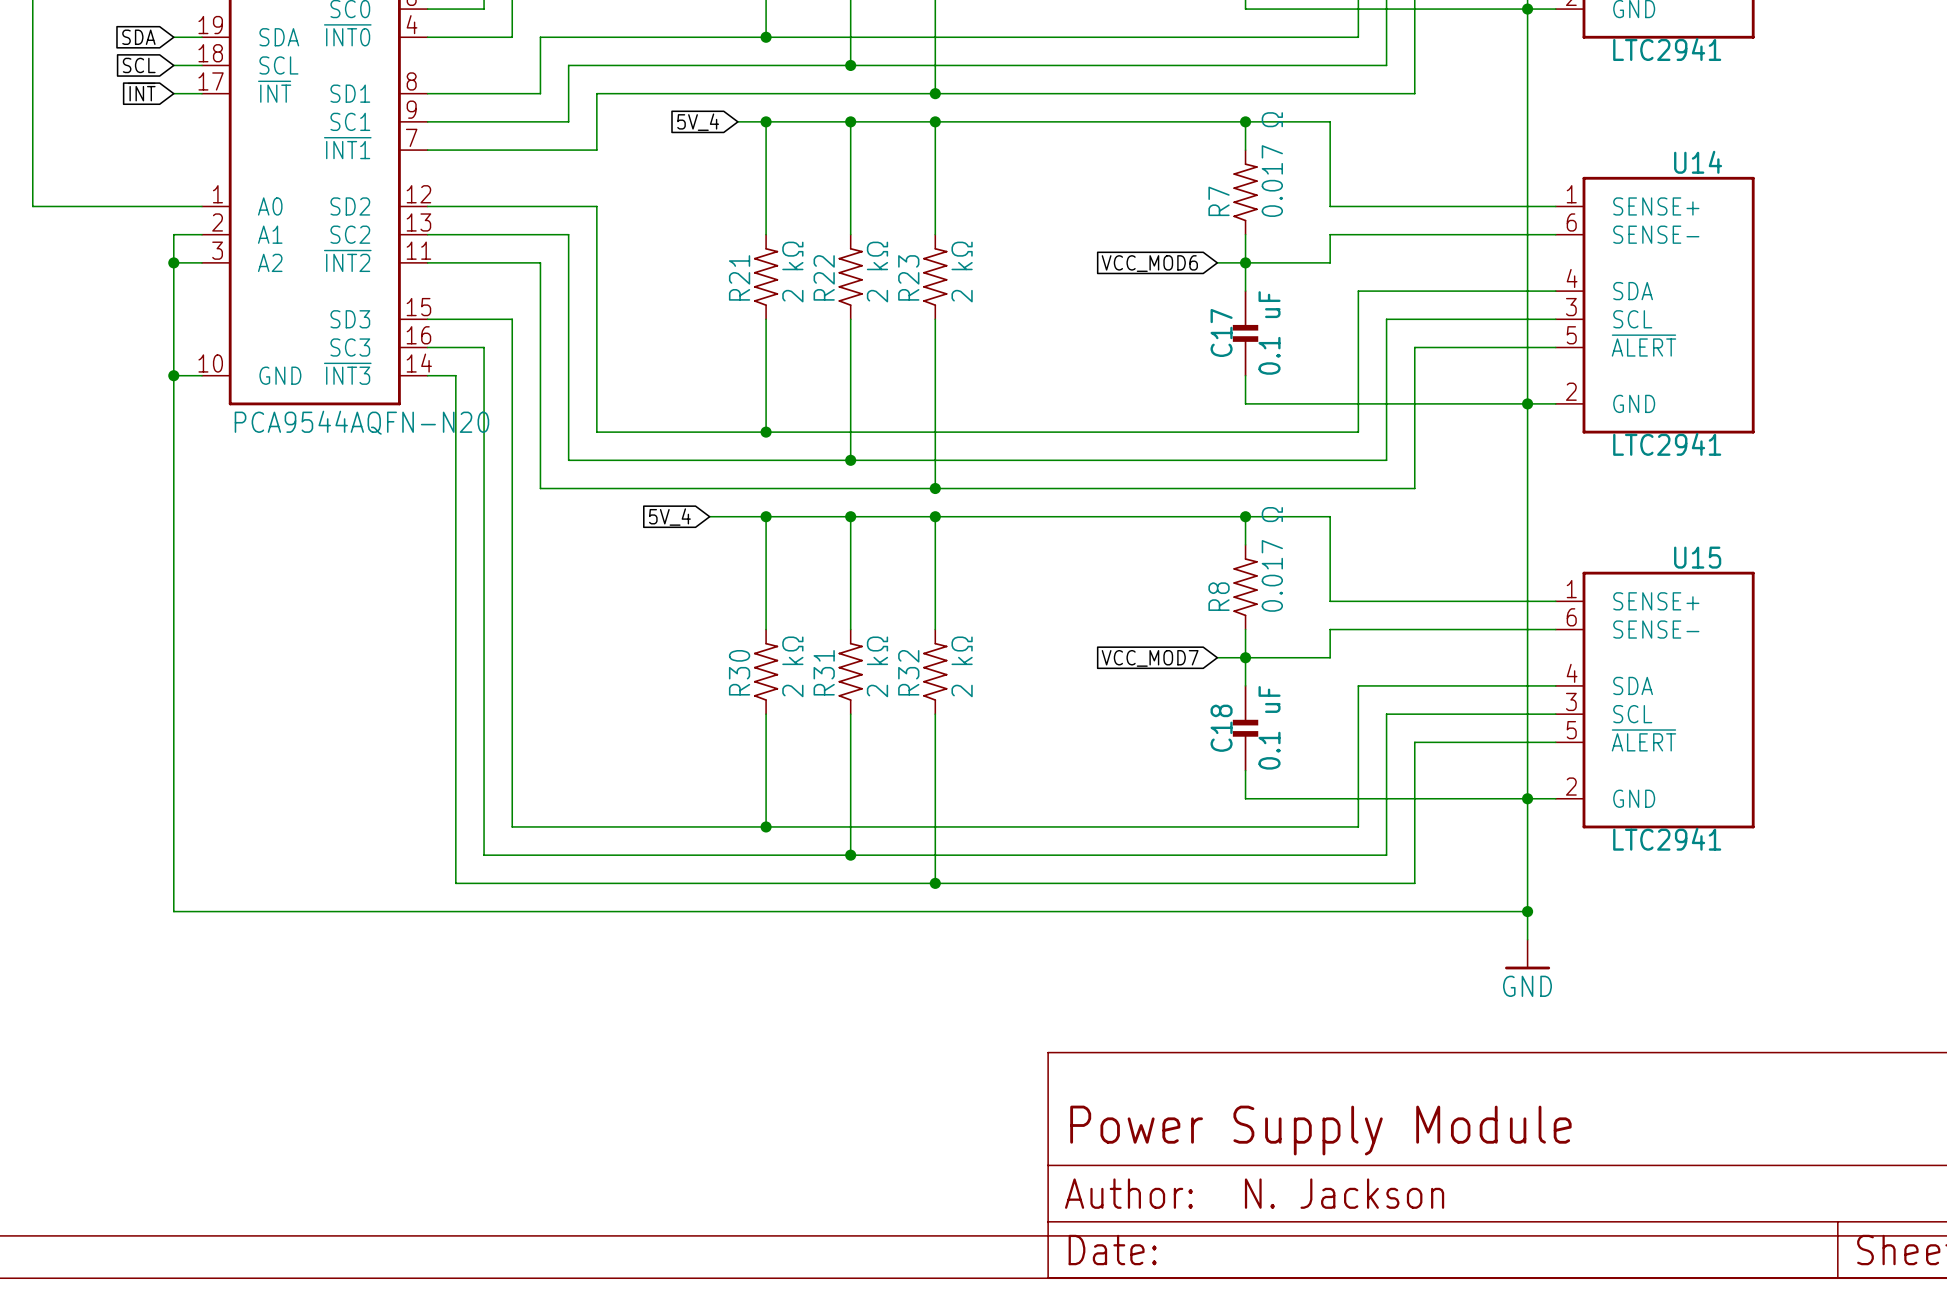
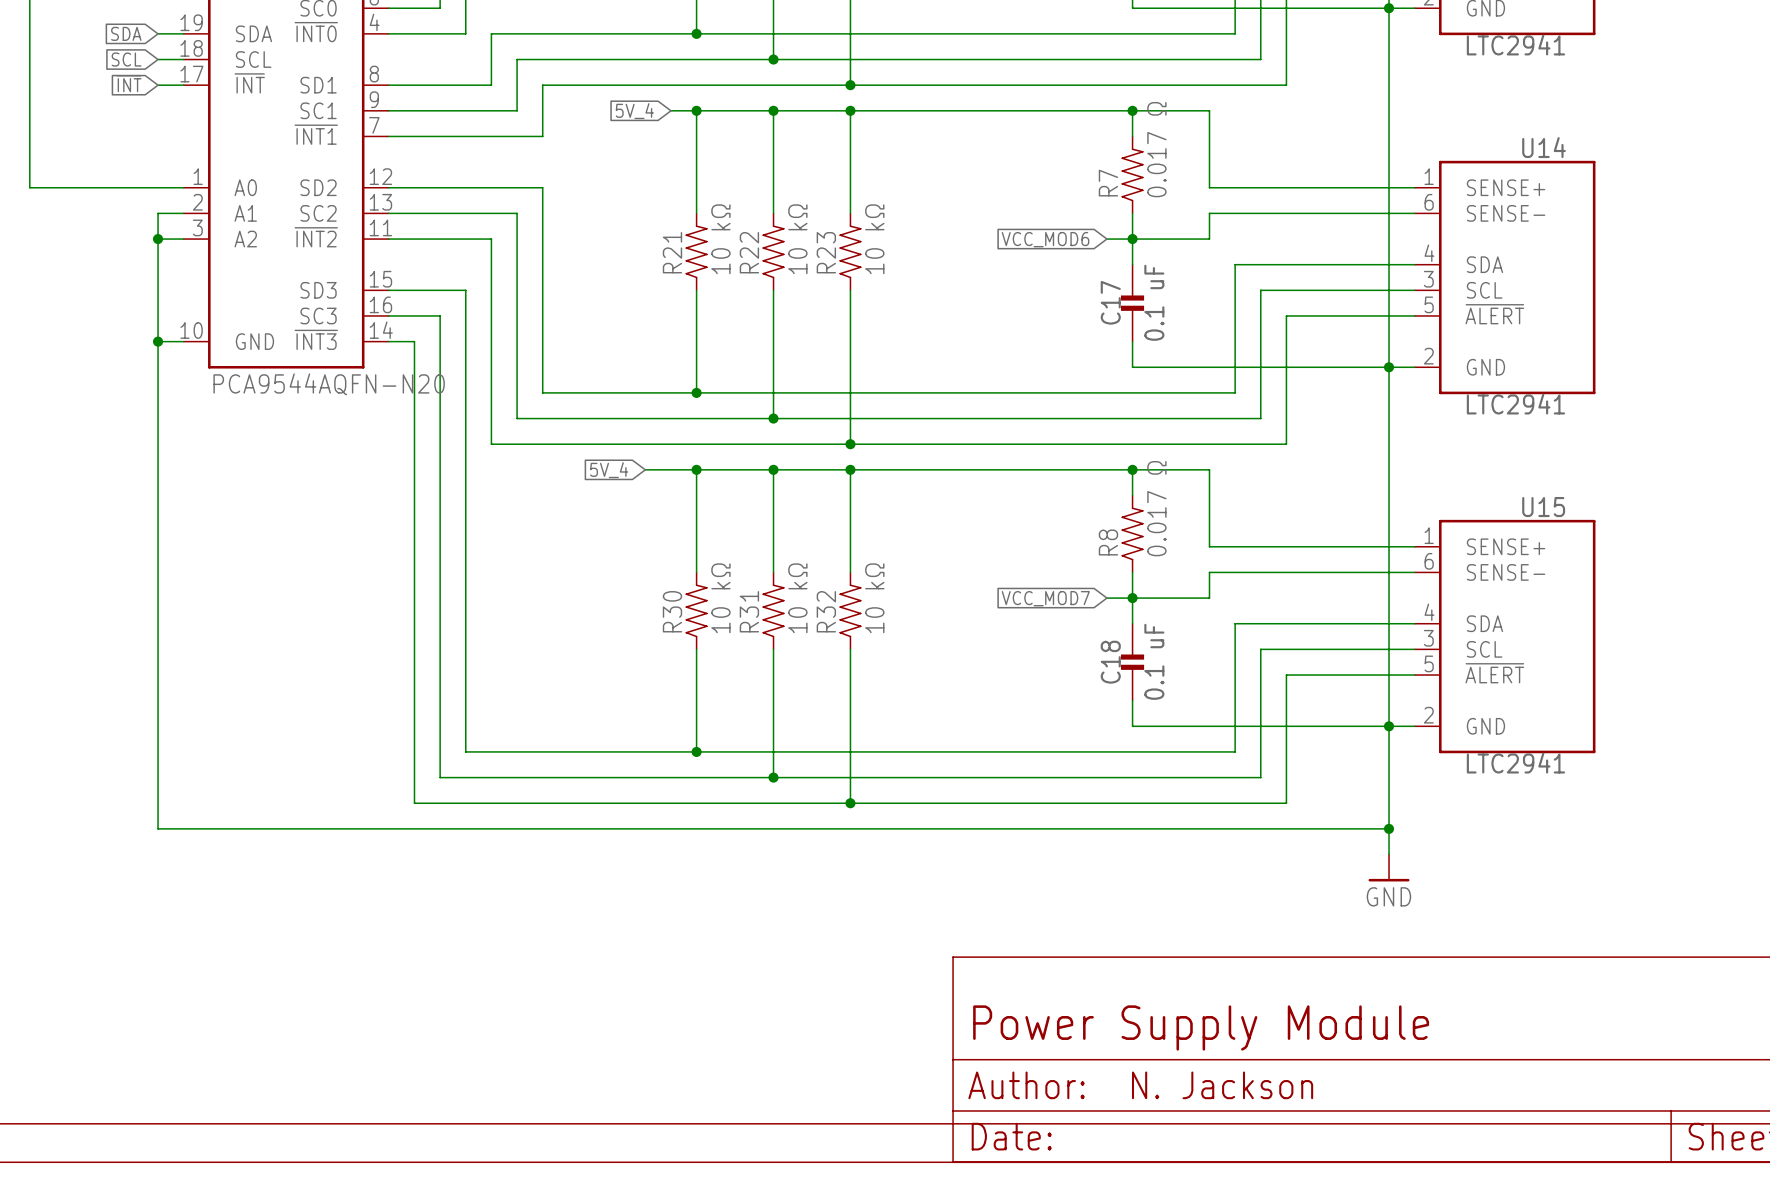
R21 value: 2 kΩ (792, 272) -> 10 kΩ (720, 239)
R22 value: 2 kΩ (877, 272) -> 10 kΩ (797, 239)
R23 value: 2 kΩ (962, 272) -> 10 kΩ (874, 239)
R30 value: 2 kΩ (792, 666) -> 10 kΩ (720, 598)
R31 value: 2 kΩ (877, 666) -> 10 kΩ (797, 598)
R32 value: 2 kΩ (962, 666) -> 10 kΩ (874, 598)

